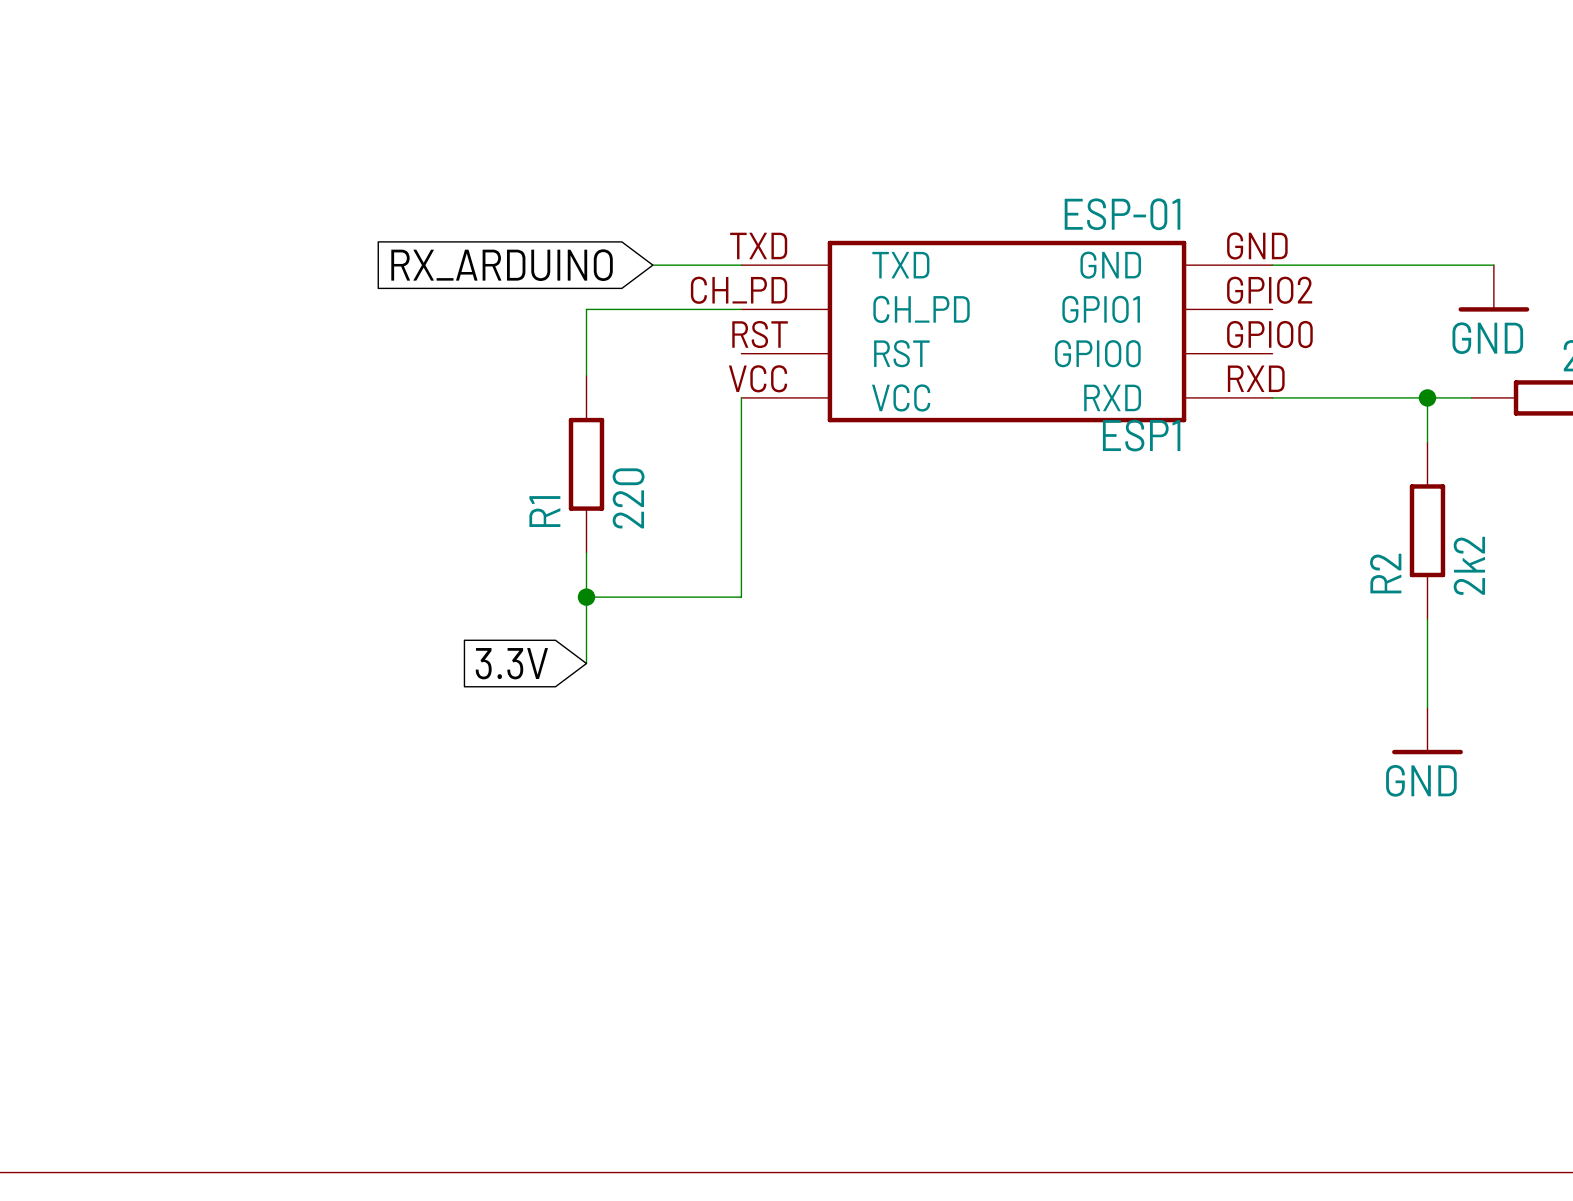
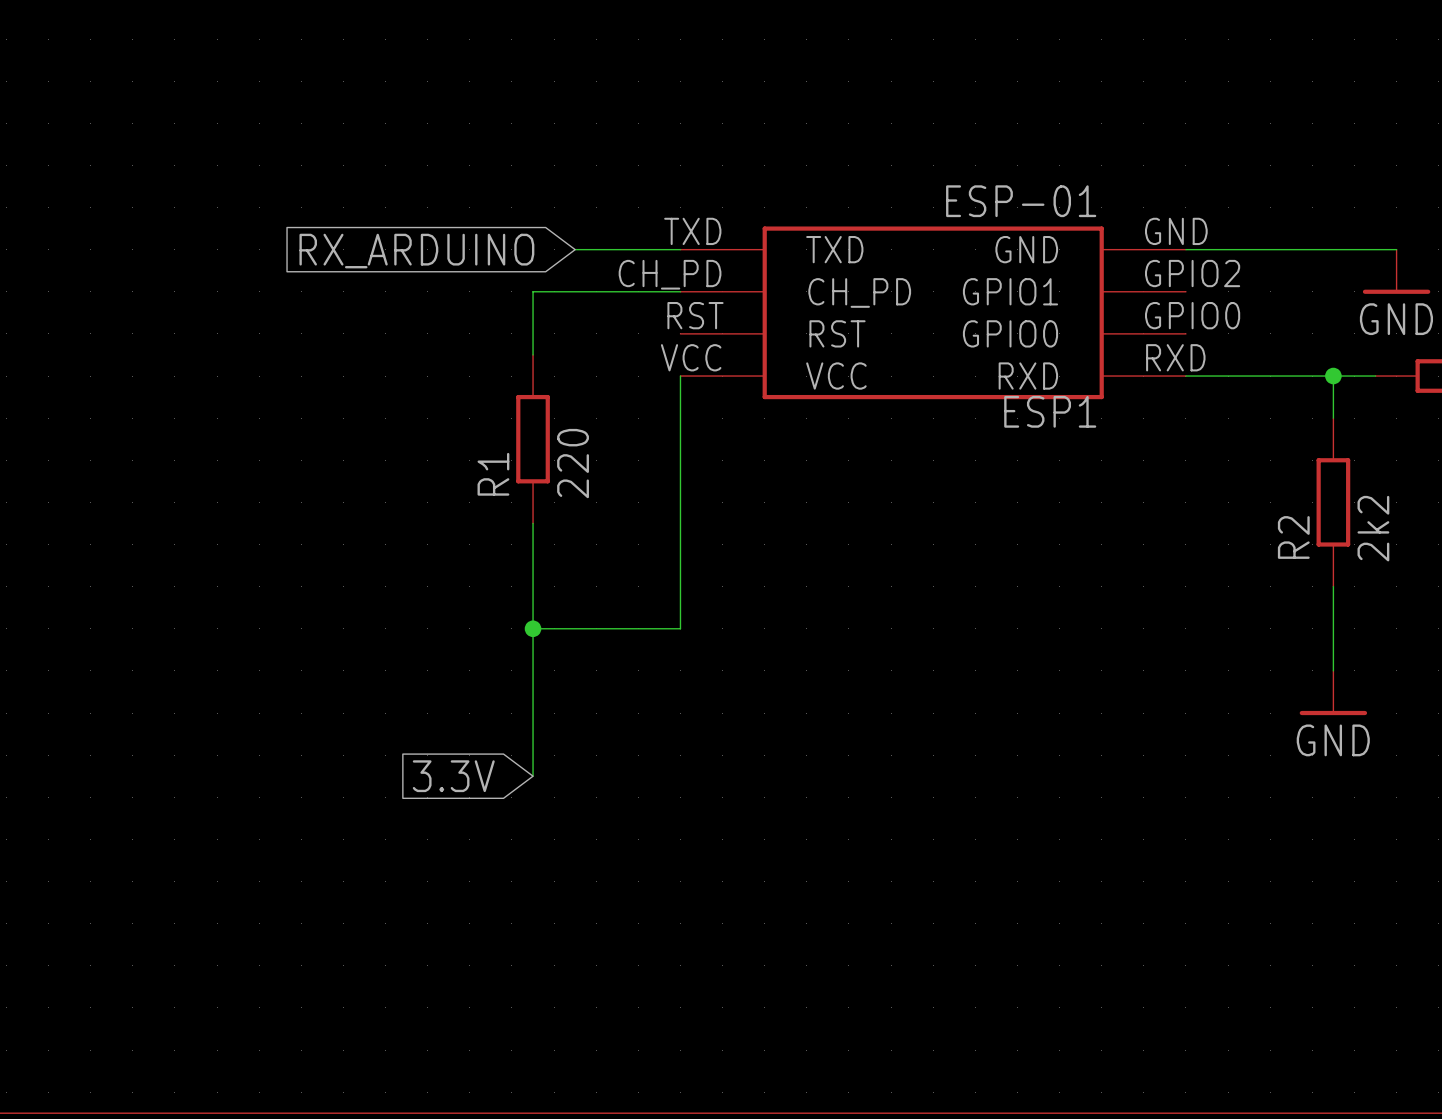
global label position: RX_ARDUINO (502, 265) -> RX_ARDUINO (416, 251)
wire: none -> (575, 249) (596, 249)
wire: (586, 597) (741, 597) -> (533, 776) (533, 628) (680, 628) (680, 565)
junction position: (586, 597) -> (533, 628)
global label position: 3.3V (511, 663) -> 3.3V (453, 776)

